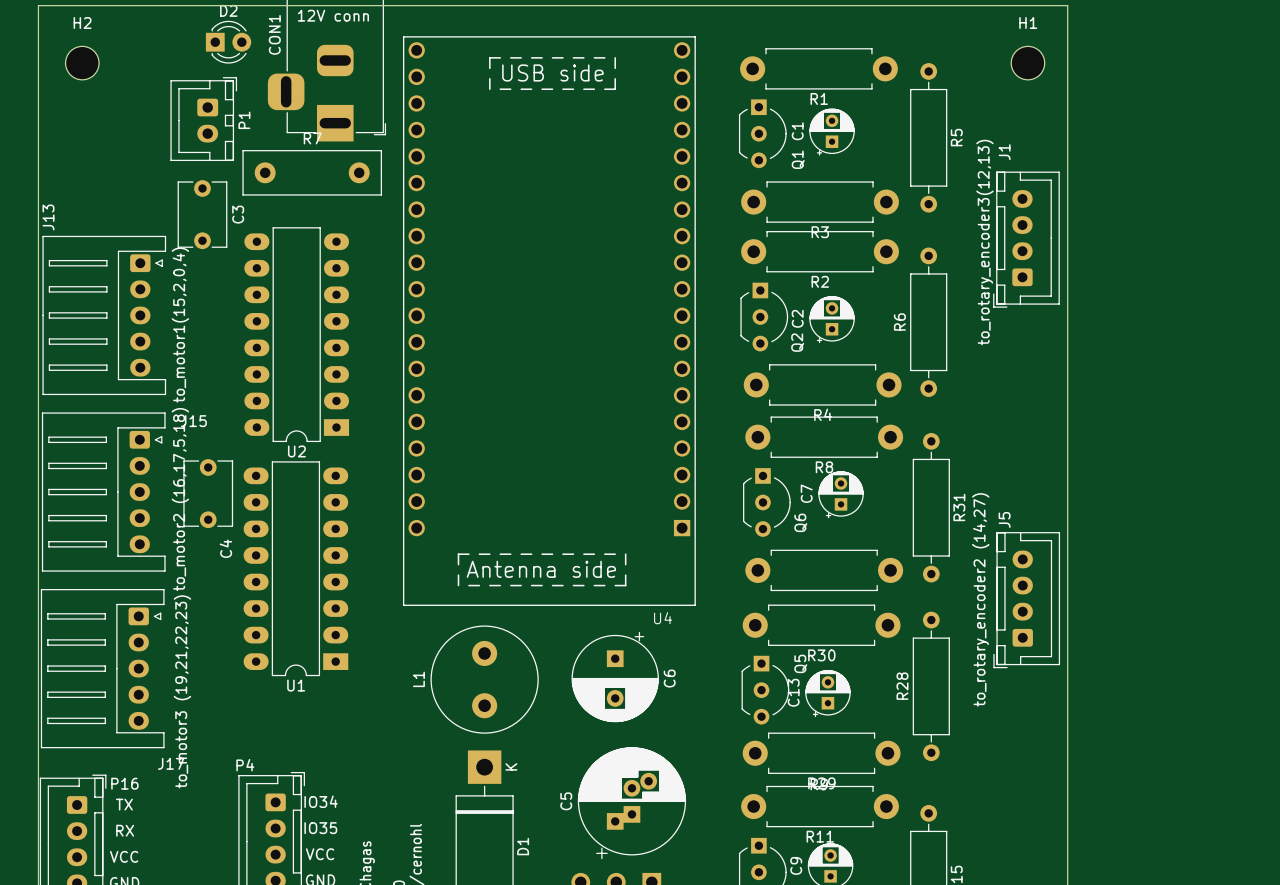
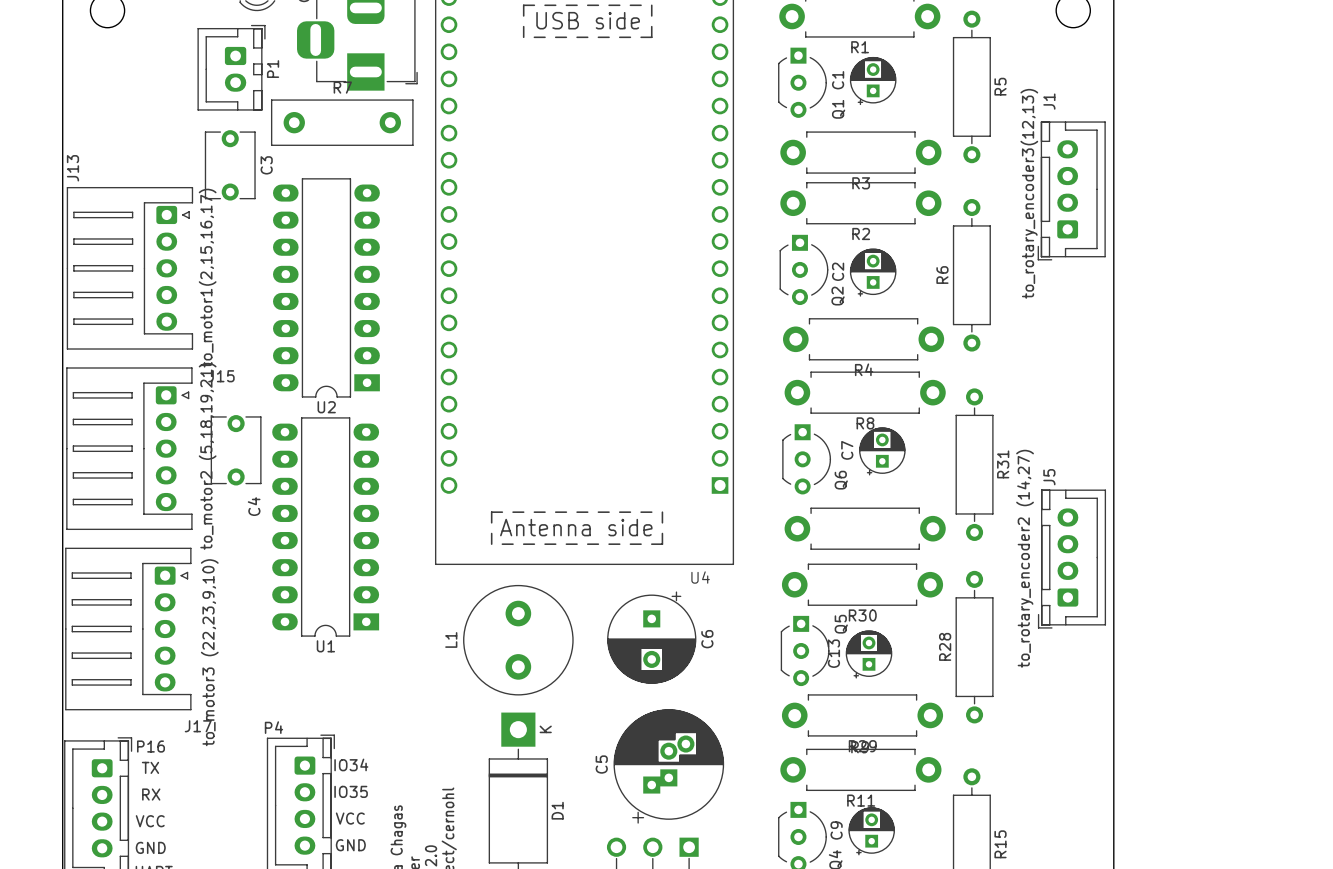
J13 value: to_motor1(15,2,0,4) (180, 325) -> to_motor1(2,15,16,17) (207, 278)
J15 value: to_motor2 (16,17,5,18) (180, 499) -> to_motor2 (5,18,19,21) (207, 456)
J17 value: to_motor3 (19,21,22,23) (182, 691) -> to_motor3 (22,23,9,10) (209, 652)

